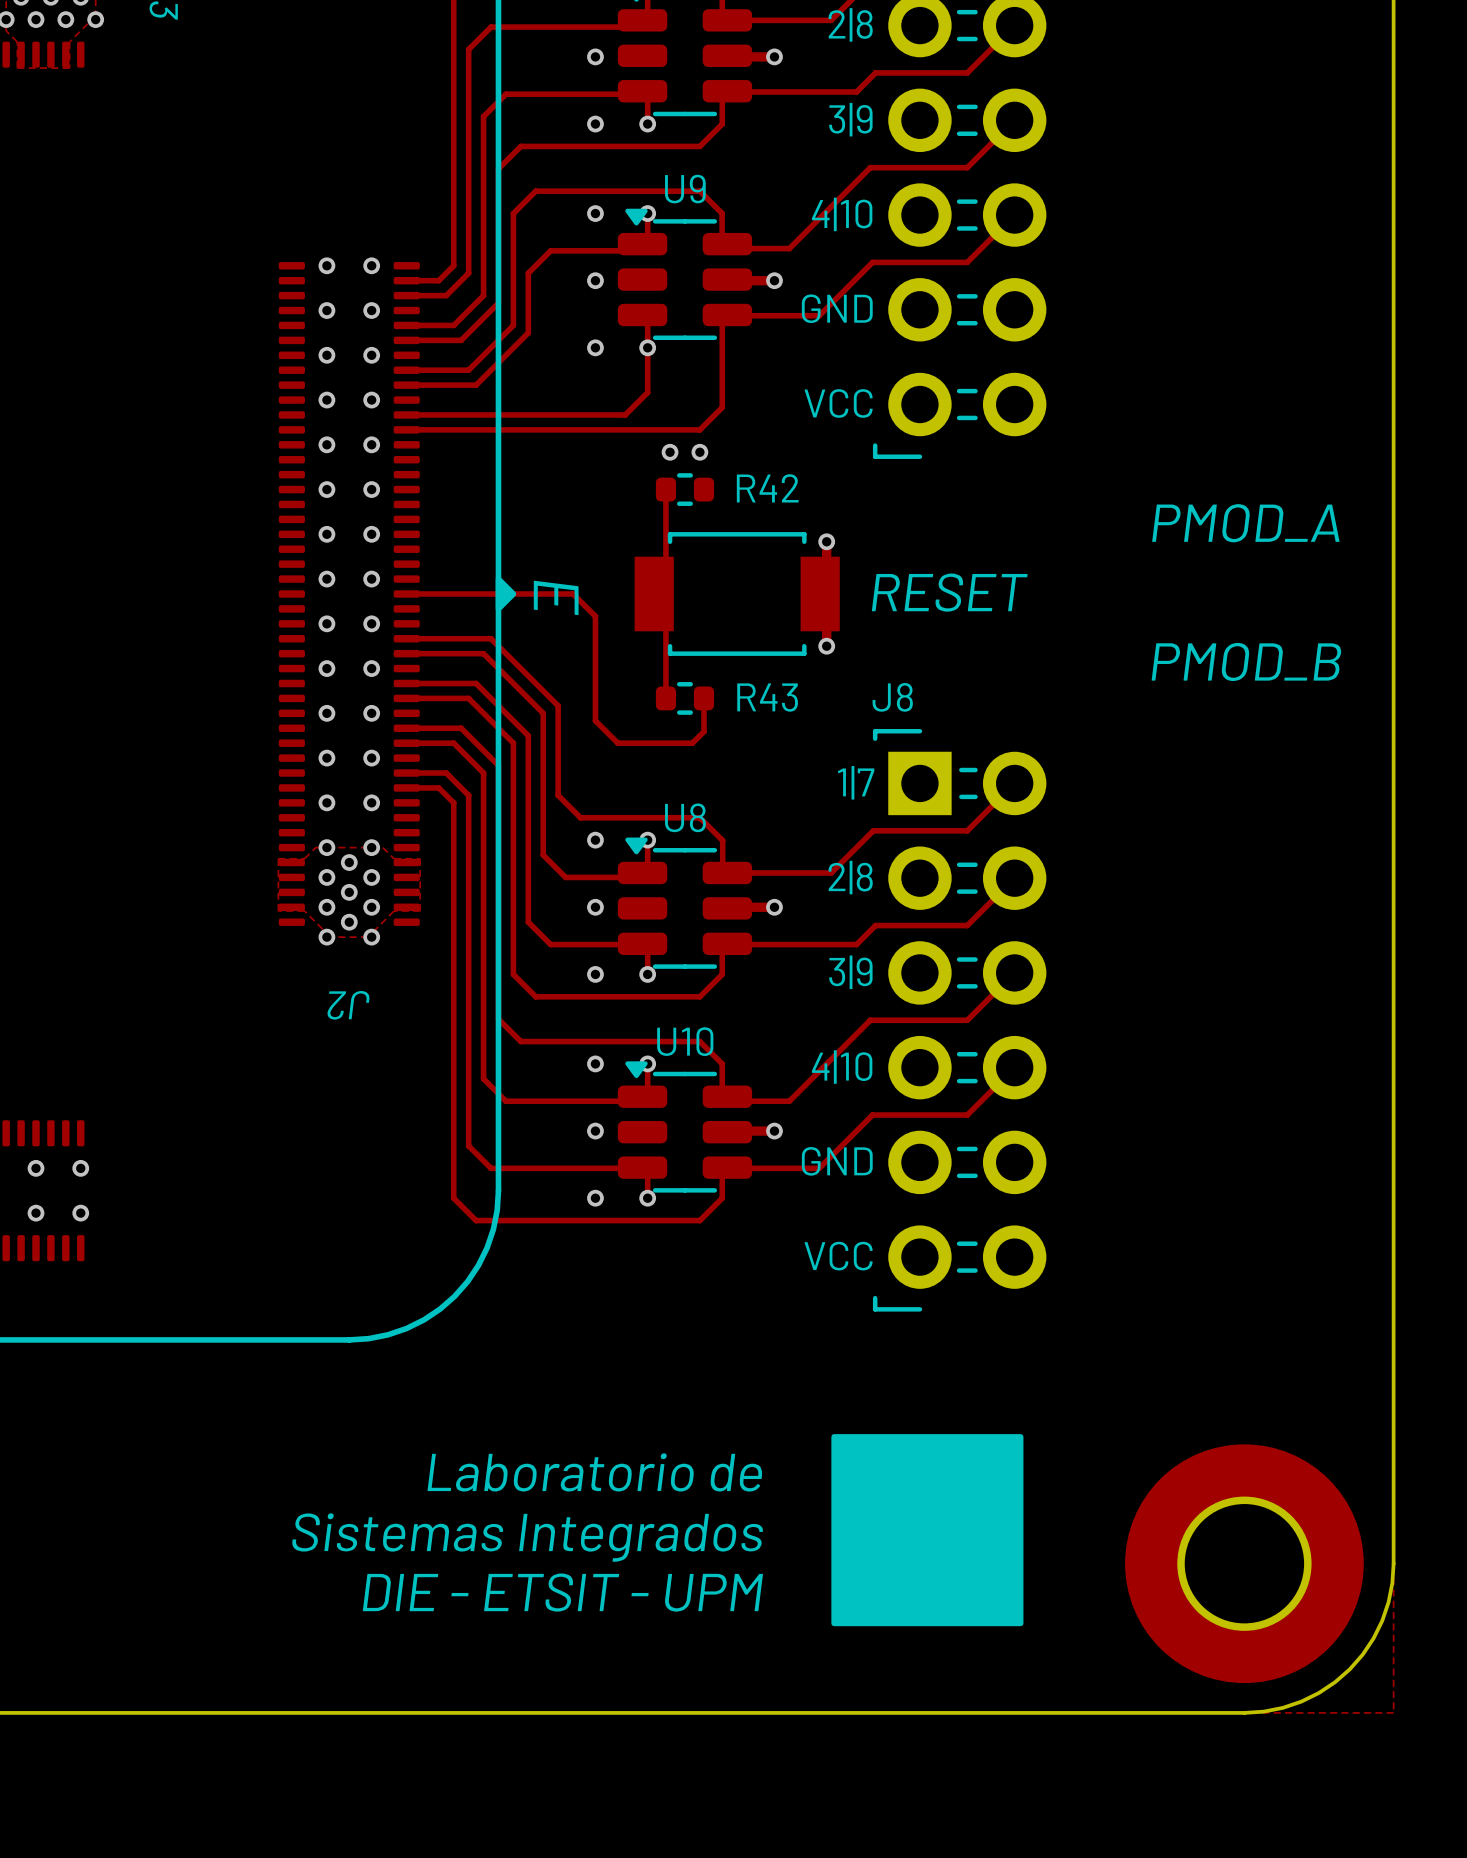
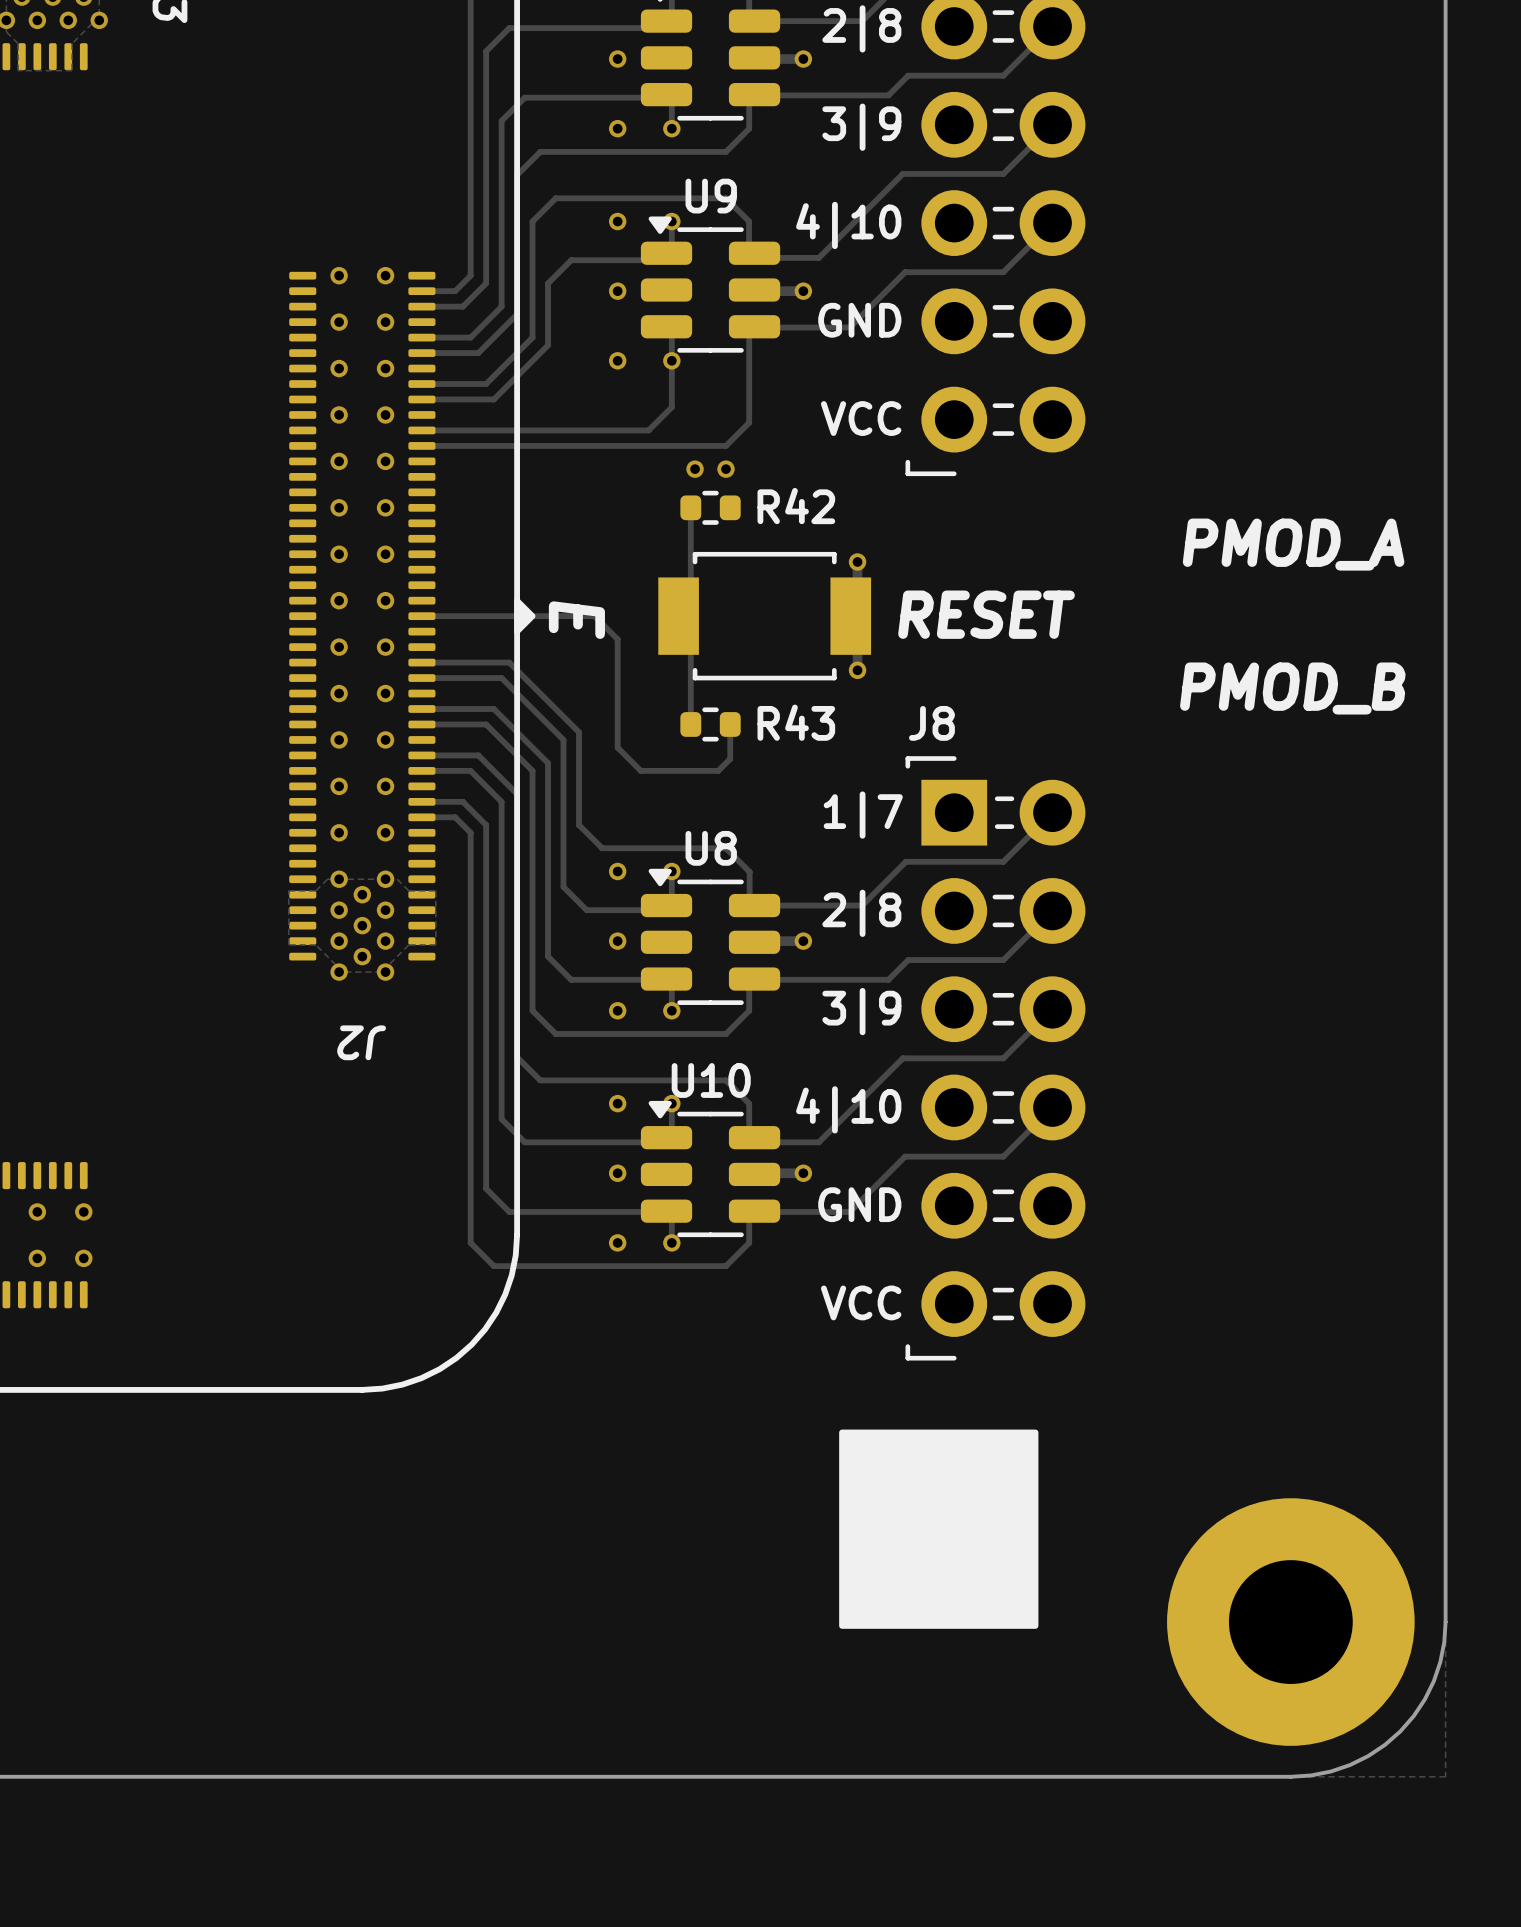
text: Laboratorio de (594, 1472) -> none
drawing position: (927, 1530) -> (938, 1529)
text: Sistemas Integrados (527, 1537) -> none
text: DIE - ETSIT - UPM (562, 1592) -> none

